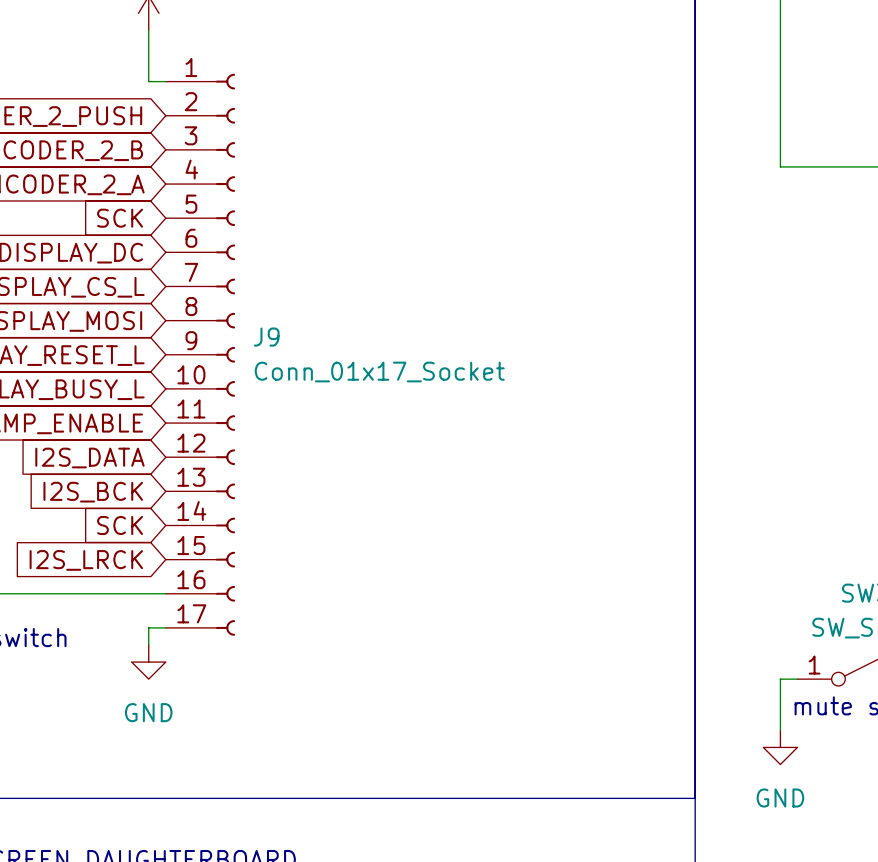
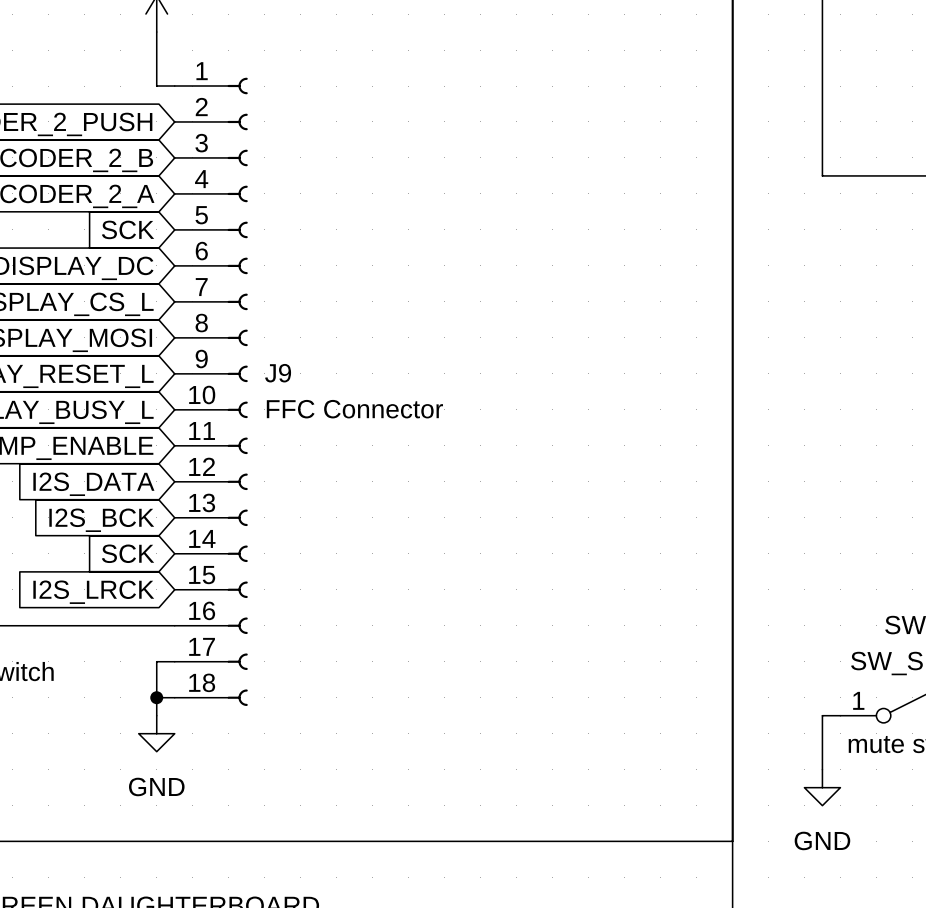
J9 symbol: [165, 73, 236, 636] -> [174, 77, 248, 706]
J9 value: Conn_01x17_Socket (379, 372) -> FFC Connector (354, 409)
power symbol position: GND (148, 662) -> GND (156, 733)
junction: none -> (156, 697)

